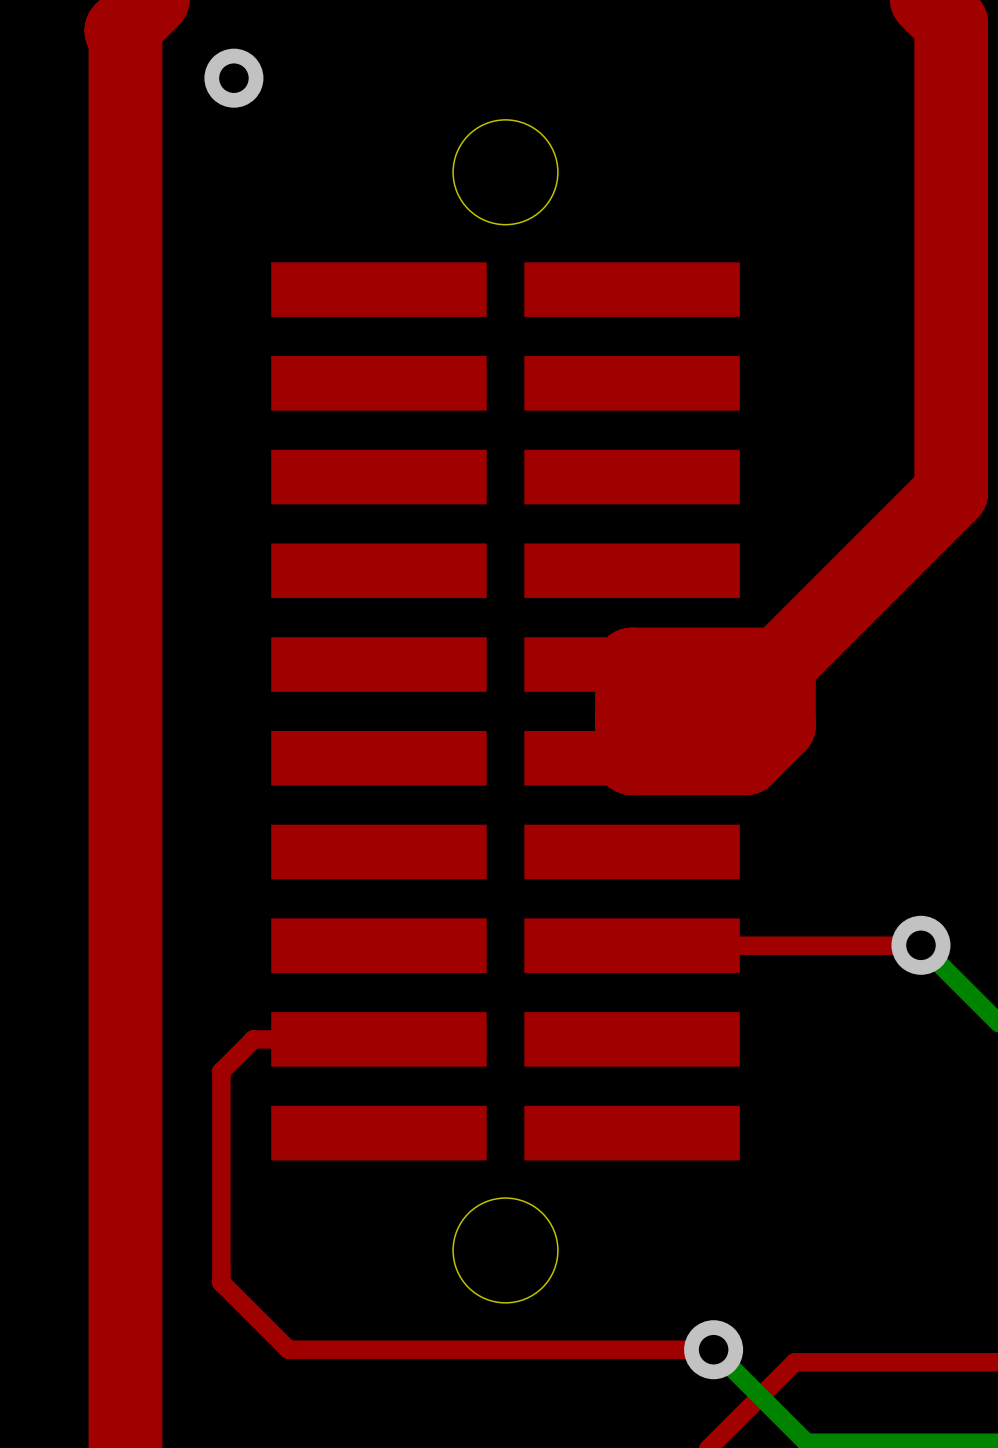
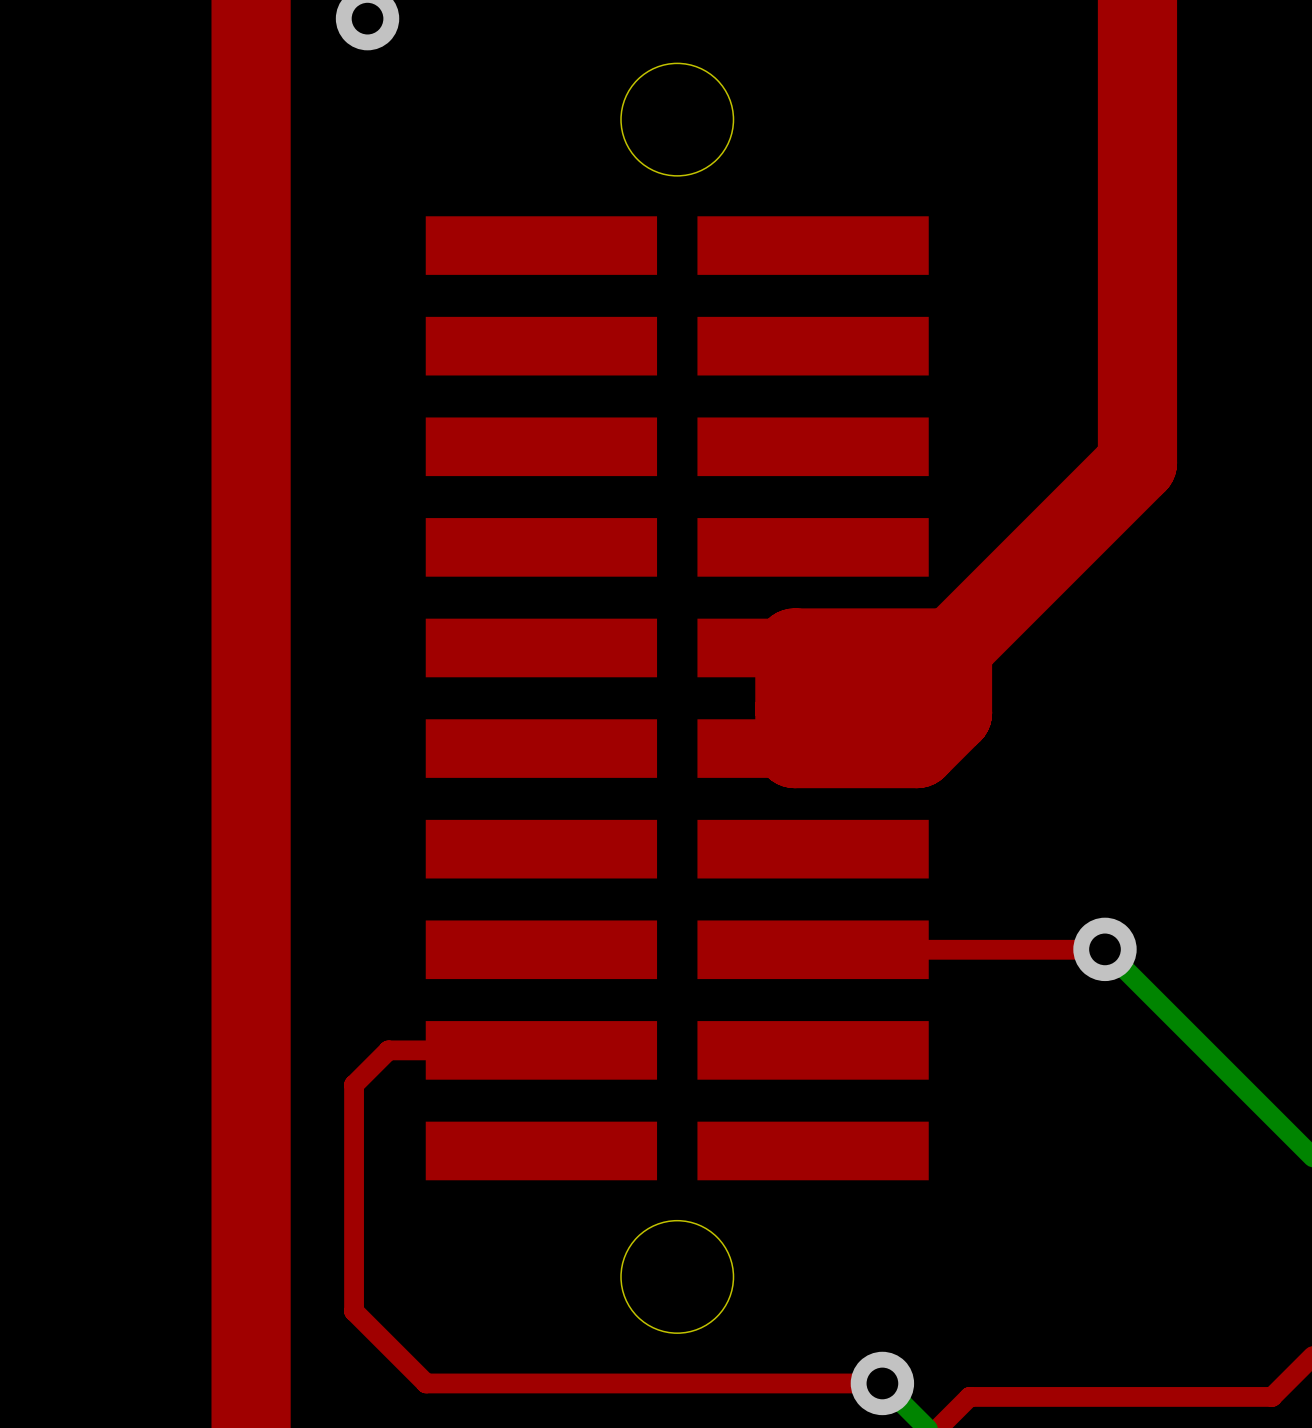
part position: (505, 711) -> (677, 698)

